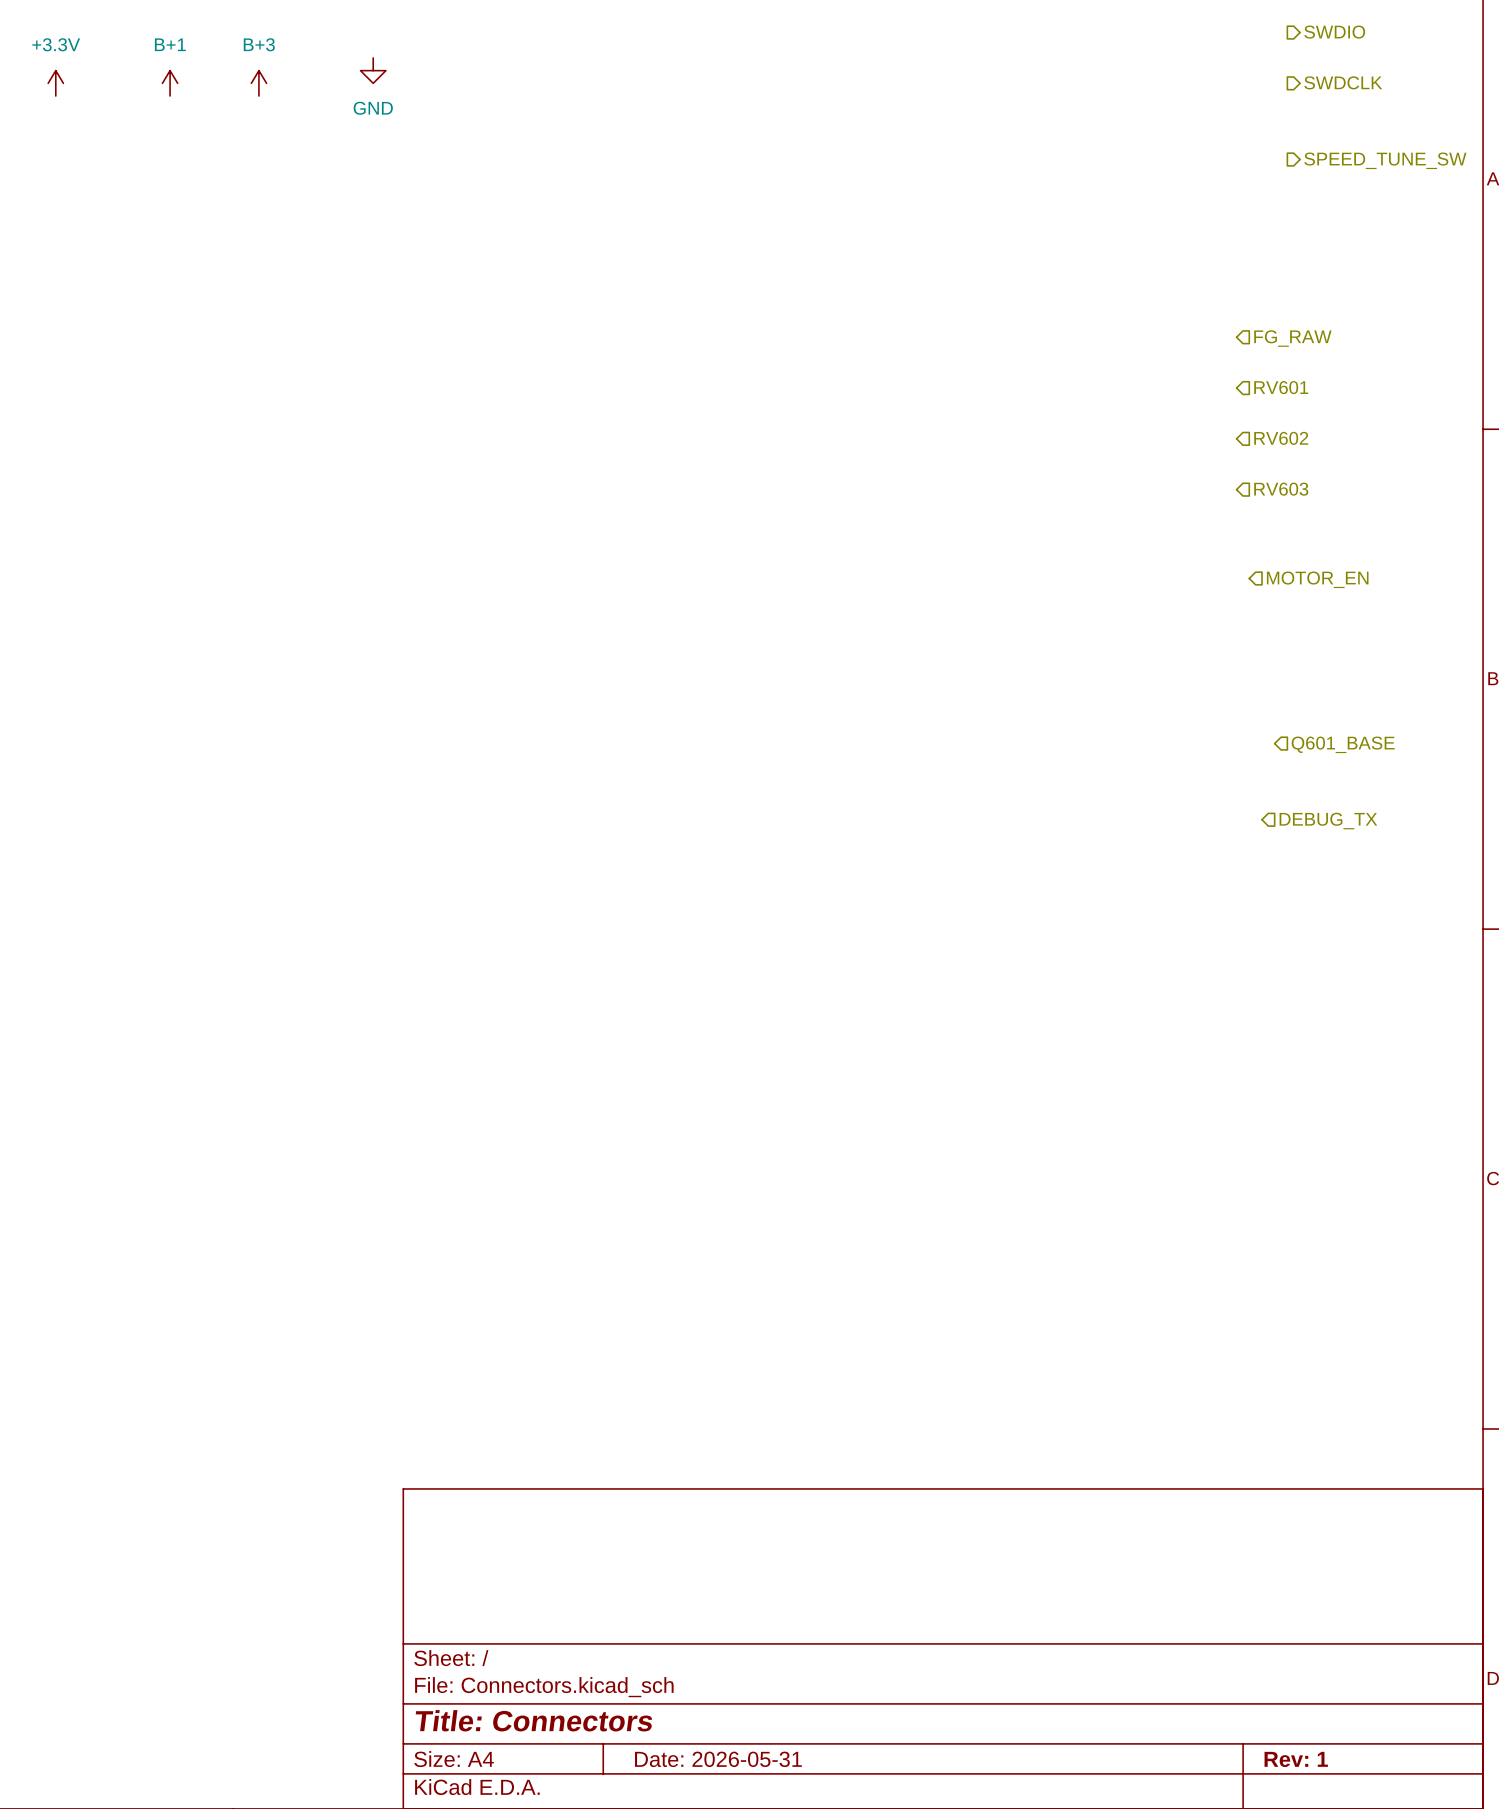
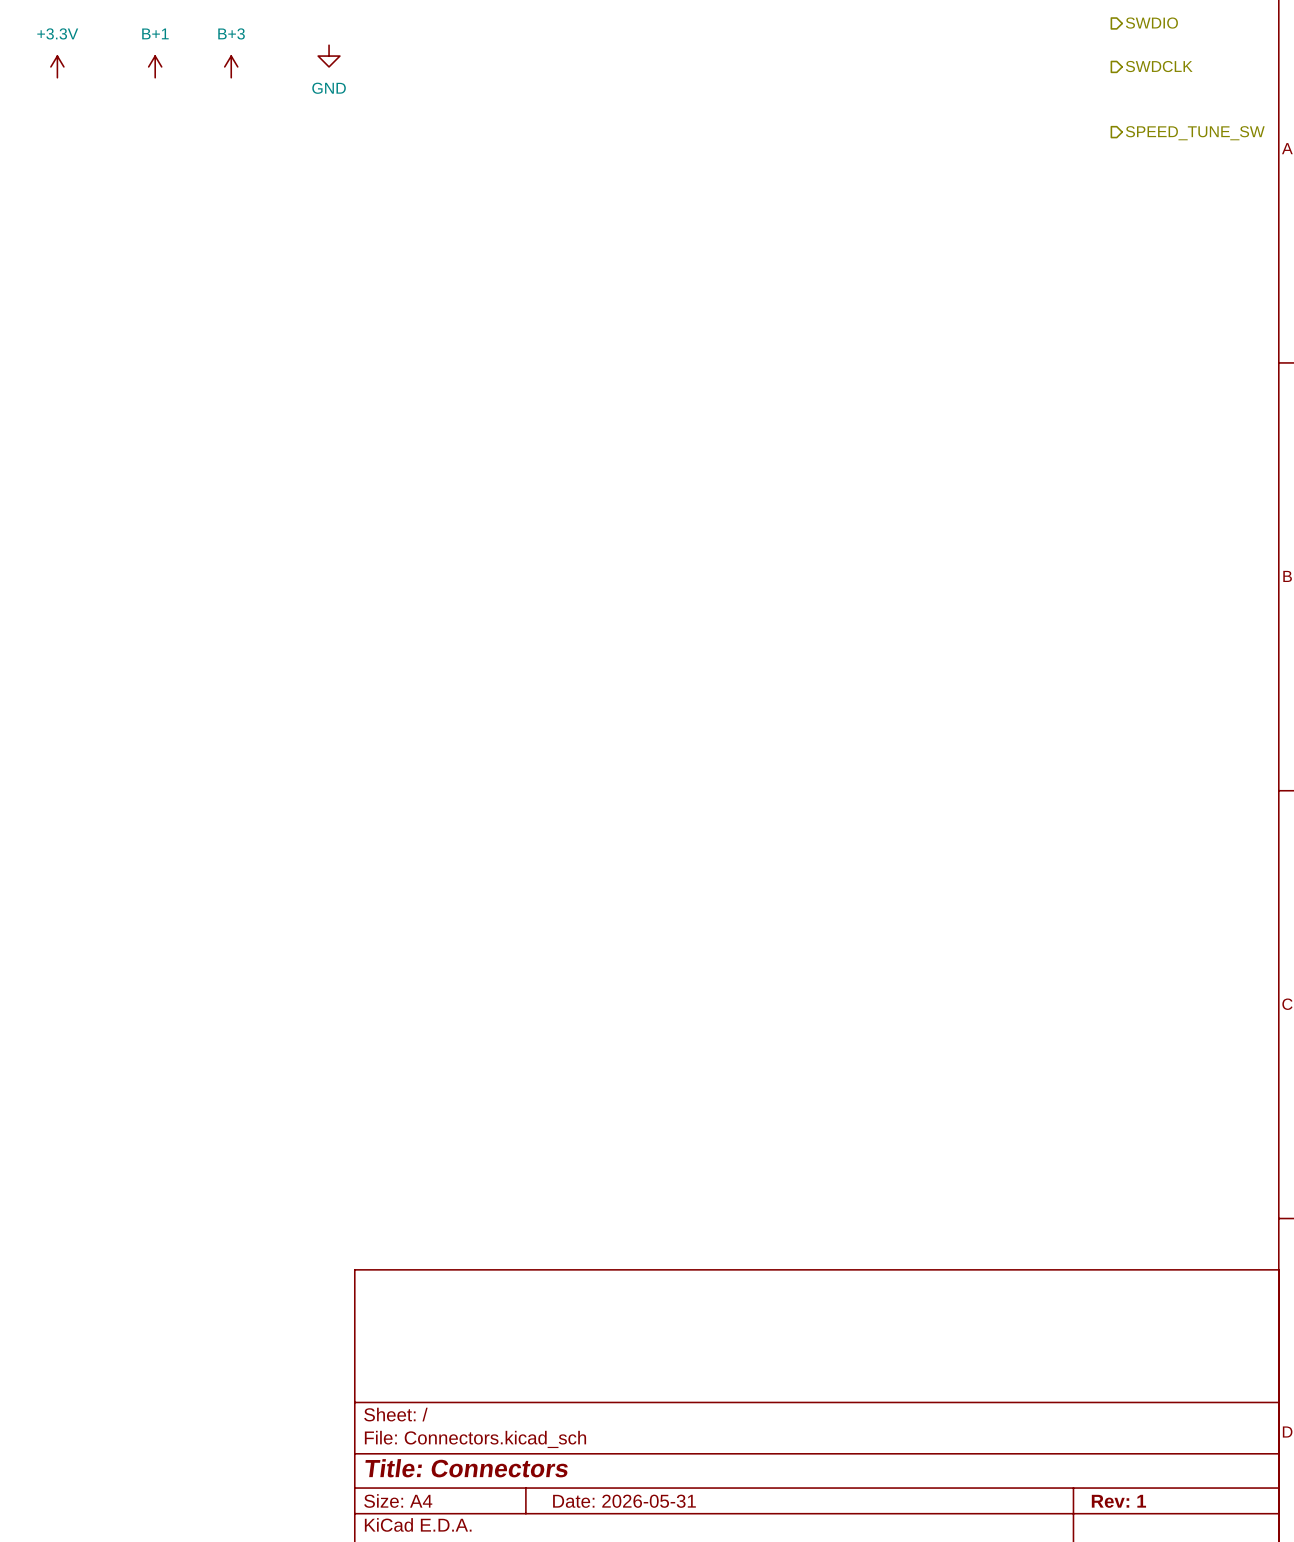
hierarchical label: FG_RAW (1292, 338) -> none
hierarchical label: RV601 (1281, 387) -> none
hierarchical label: RV602 (1281, 438) -> none
hierarchical label: RV603 (1281, 489) -> none
hierarchical label: MOTOR_EN (1317, 579) -> none
hierarchical label: Q601_BASE (1343, 744) -> none
hierarchical label: DEBUG_TX (1328, 821) -> none

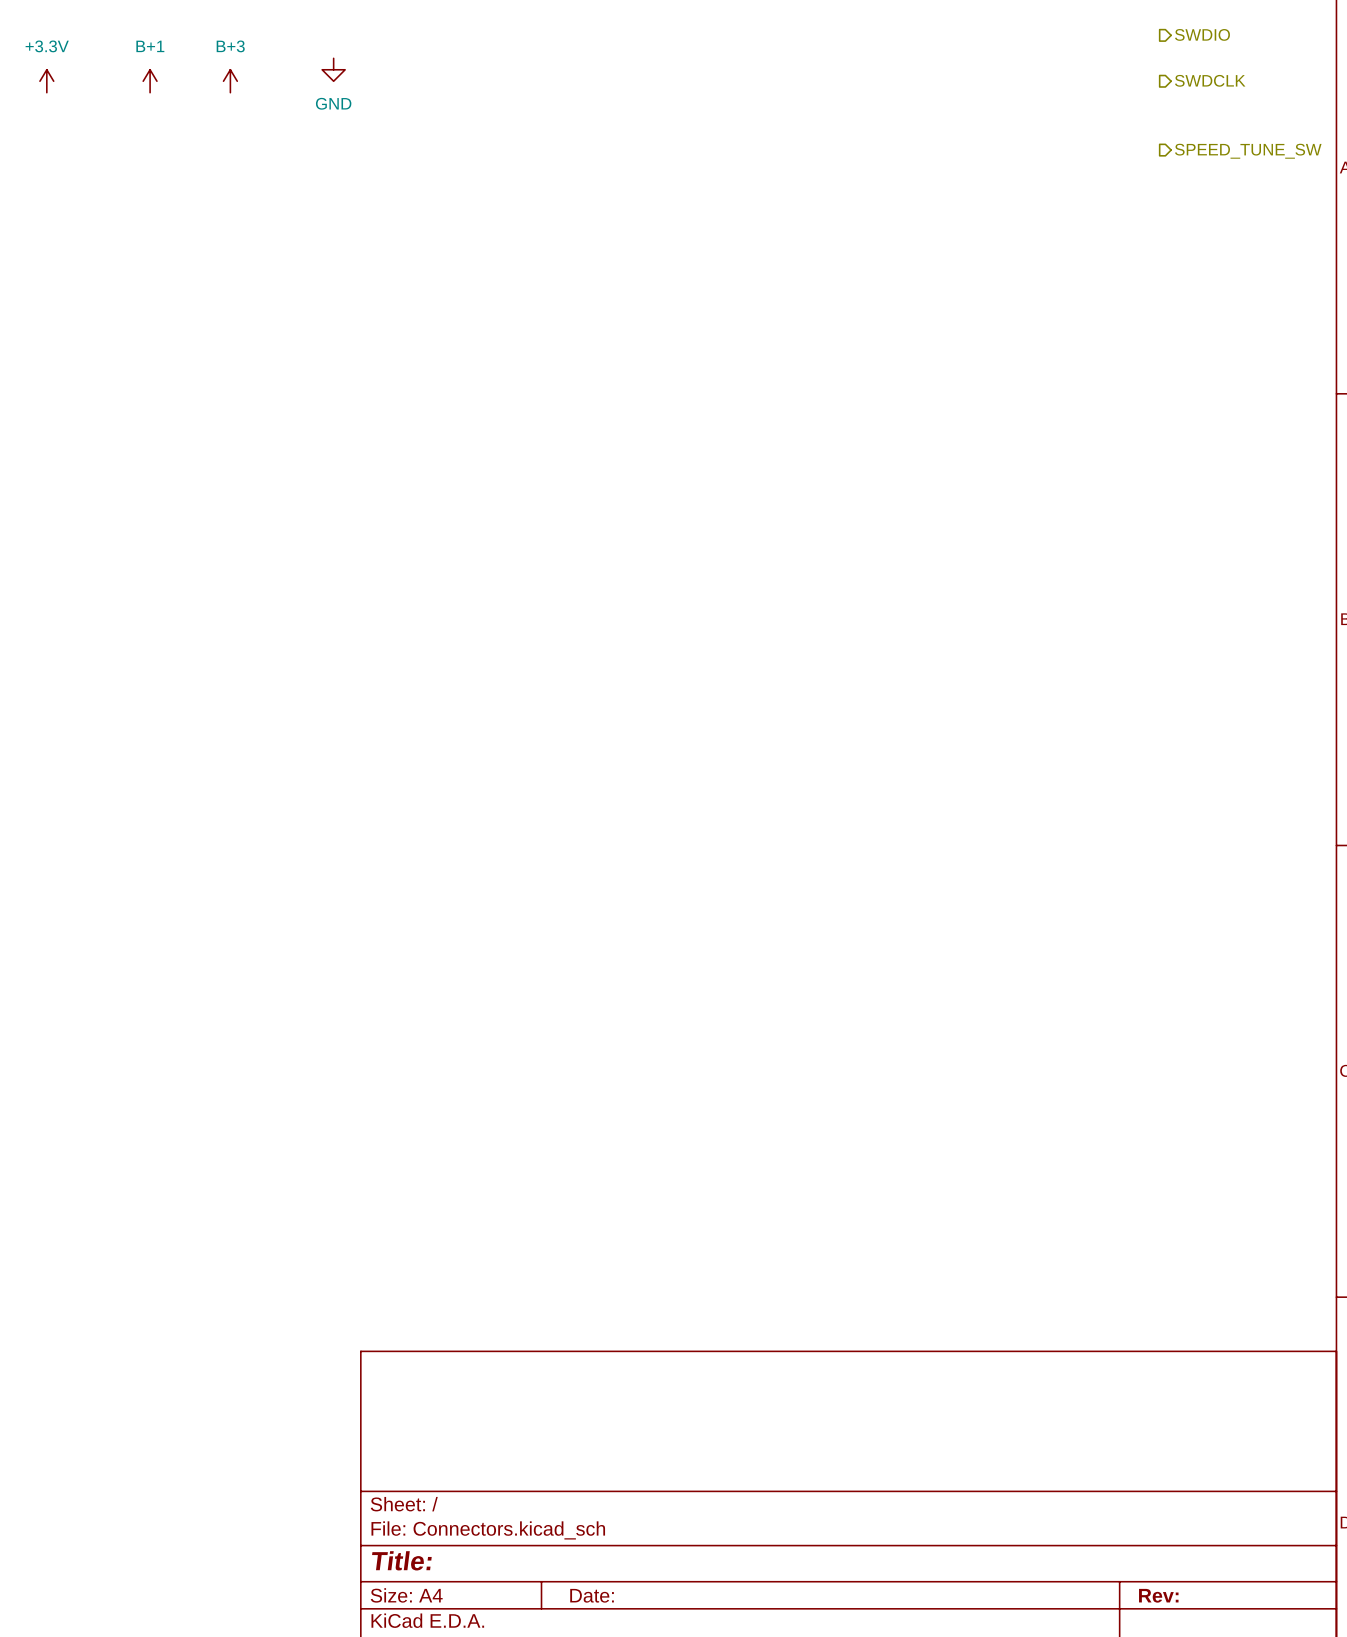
title block: Title: Connectors (466, 1468) -> Title: (401, 1560)
title block: Date: 2026-05-31 (624, 1501) -> Date: (592, 1595)
title block: Rev: 1 (1118, 1501) -> Rev: (1158, 1595)

